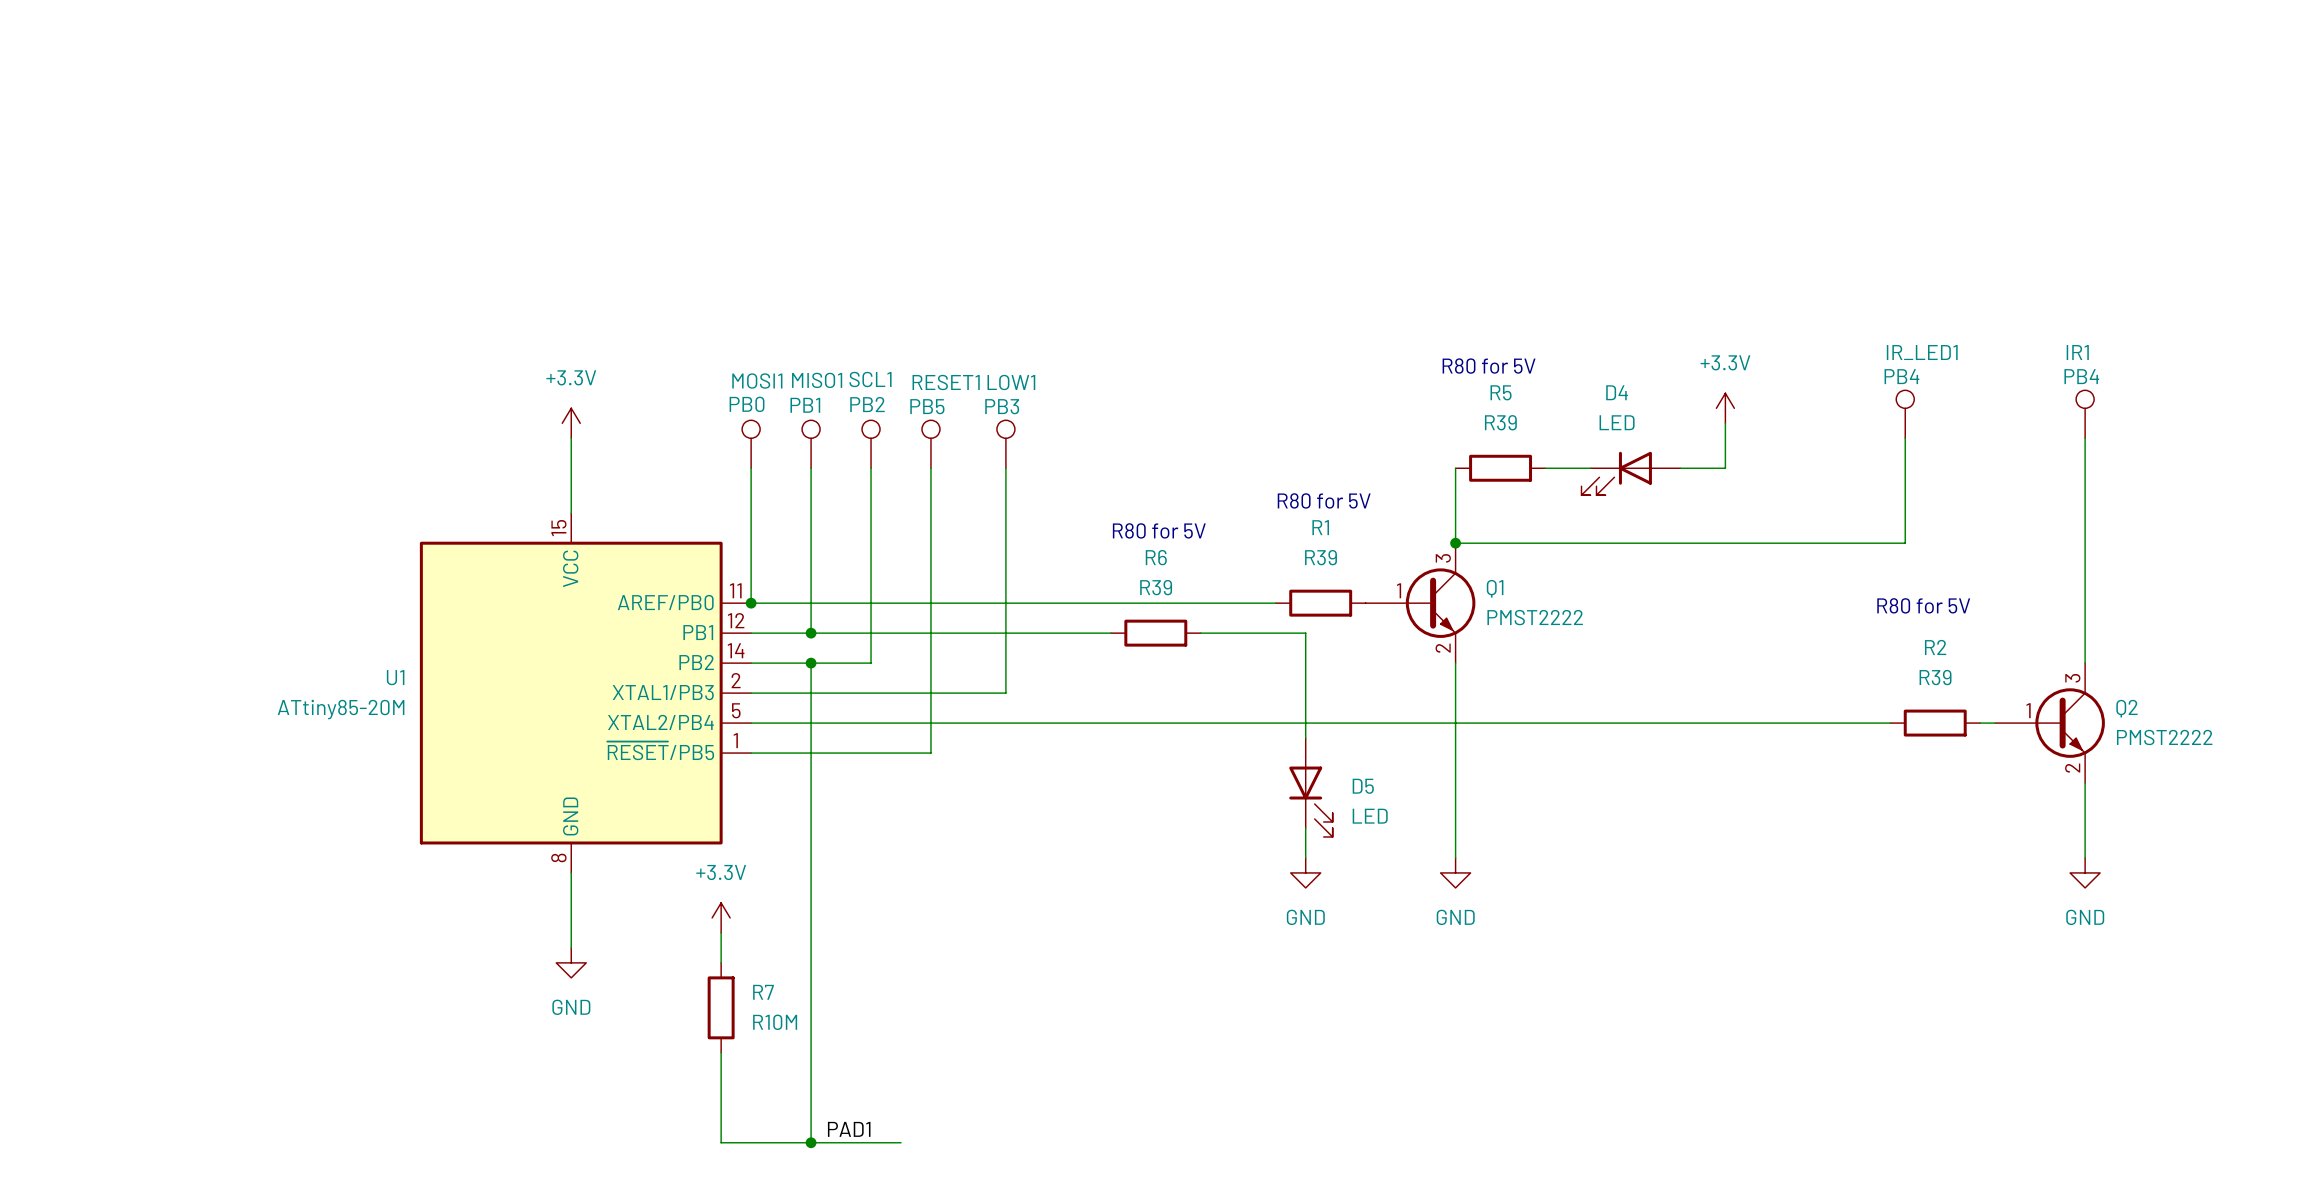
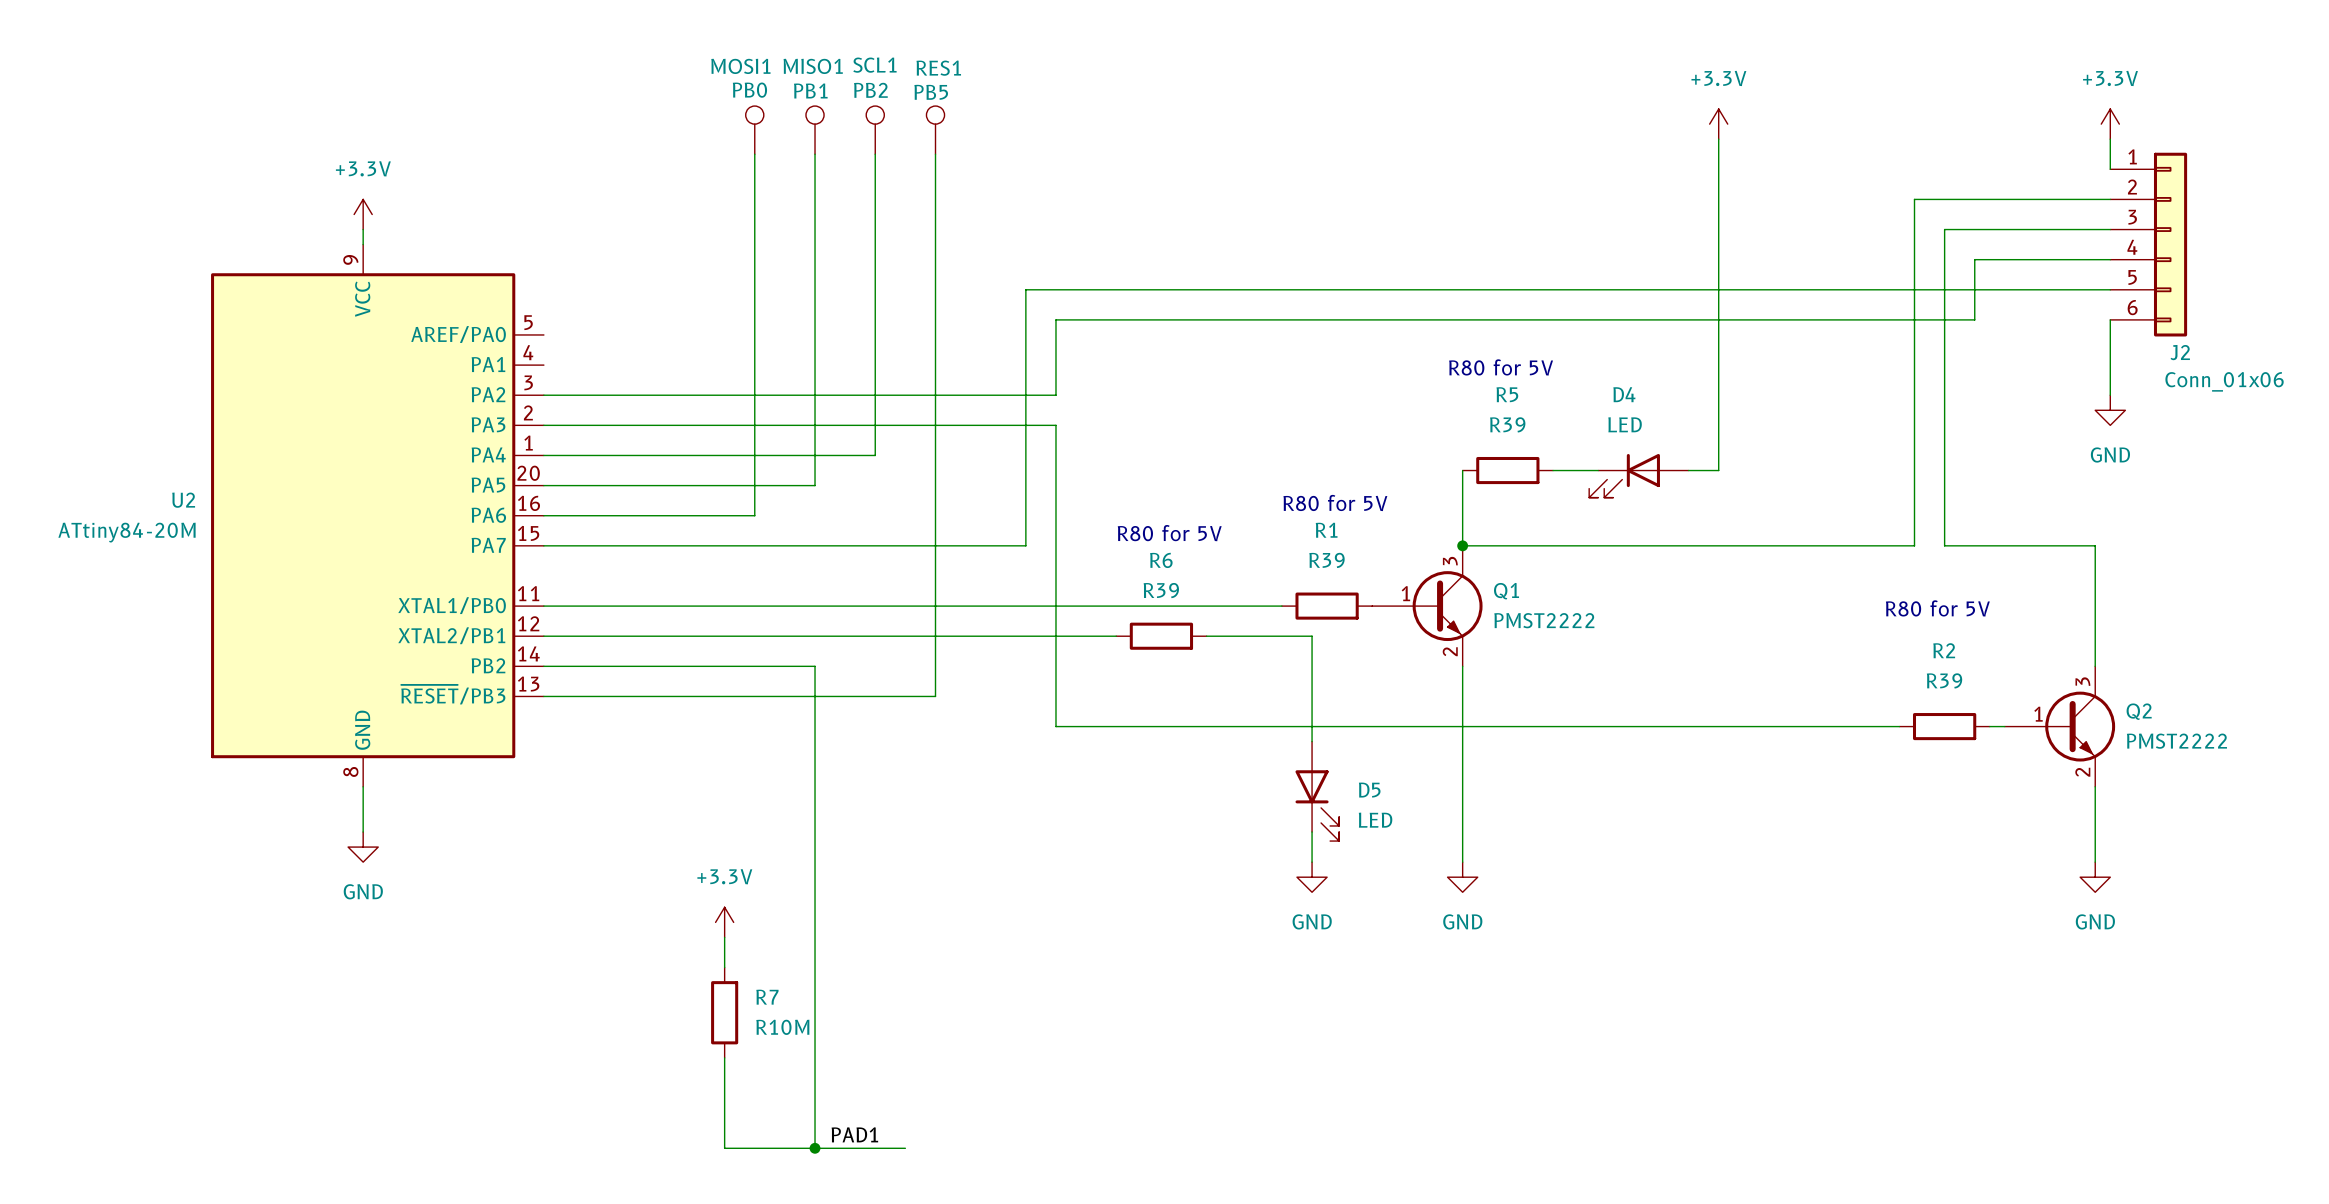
power symbol: none -> +3.3V (1718, 124)
power symbol: none -> +3.3V (2110, 124)
RES1: none -> PB5 (935, 130)
wire: none -> (2110, 139) (2110, 169)
wire: none -> (754, 154) (754, 470)
wire: none -> (815, 154) (815, 470)
wire: none -> (875, 154) (875, 455) (543, 455)
wire: none -> (935, 154) (935, 470)
wire: none -> (2110, 199) (1914, 199) (1914, 440)
power symbol: none -> +3.3V (363, 214)
wire: none -> (363, 229) (363, 244)
J2: none -> Conn_01x06 (2148, 244)
wire: none -> (2110, 259) (1974, 259) (1974, 319) (1055, 319) (1055, 395) (543, 395)
wire: none -> (2110, 289) (1025, 289) (1025, 545) (543, 545)
wire: none -> (2110, 319) (2110, 395)
MISO1 name position: MISO1 (817, 380) -> MISO1 (813, 66)
MOSI1 name position: MOSI1 (757, 381) -> MOSI1 (740, 66)
power symbol: +3.3V (1725, 408) -> none
power symbol: none -> GND (2110, 410)
IR_LED1: PB4 (1905, 414) -> none
IR1: PB4 (2085, 414) -> none
power symbol: +3.3V (571, 423) -> none
wire: (1725, 423) (1725, 468) (1710, 468) -> (1718, 139) (1718, 470)
wire: (571, 438) (571, 513) -> none
wire: (2085, 438) (2085, 543) -> (2110, 229) (1944, 229) (1944, 545) (2095, 545)
MOSI1 position: (751, 444) -> (754, 130)
MISO1 position: (811, 444) -> (815, 130)
SCL1 position: (871, 444) -> (875, 130)
RESET1: PB5 (930, 444) -> none
LOW1: PB3 (1005, 444) -> none
wire: (871, 468) (871, 663) (811, 663) -> none
wire: (1005, 468) (1005, 693) (930, 693) (930, 753) (751, 753) -> none
wire: (811, 483) (811, 633) -> (815, 485) (543, 485)
U2: none -> ATtiny84-20M (377, 515)
wire: (751, 513) (751, 603) -> (754, 515) (543, 515)
junction: (751, 603) -> none
junction: (811, 633) -> none
junction: (811, 663) -> none
U1: ATtiny85-20M (585, 693) -> none
wire: (751, 723) (1050, 723) -> (543, 425) (1055, 425) (1055, 726)
wire: none -> (363, 786) (363, 832)
wire: (571, 872) (571, 947) -> none
power symbol position: GND (571, 962) -> GND (363, 847)

